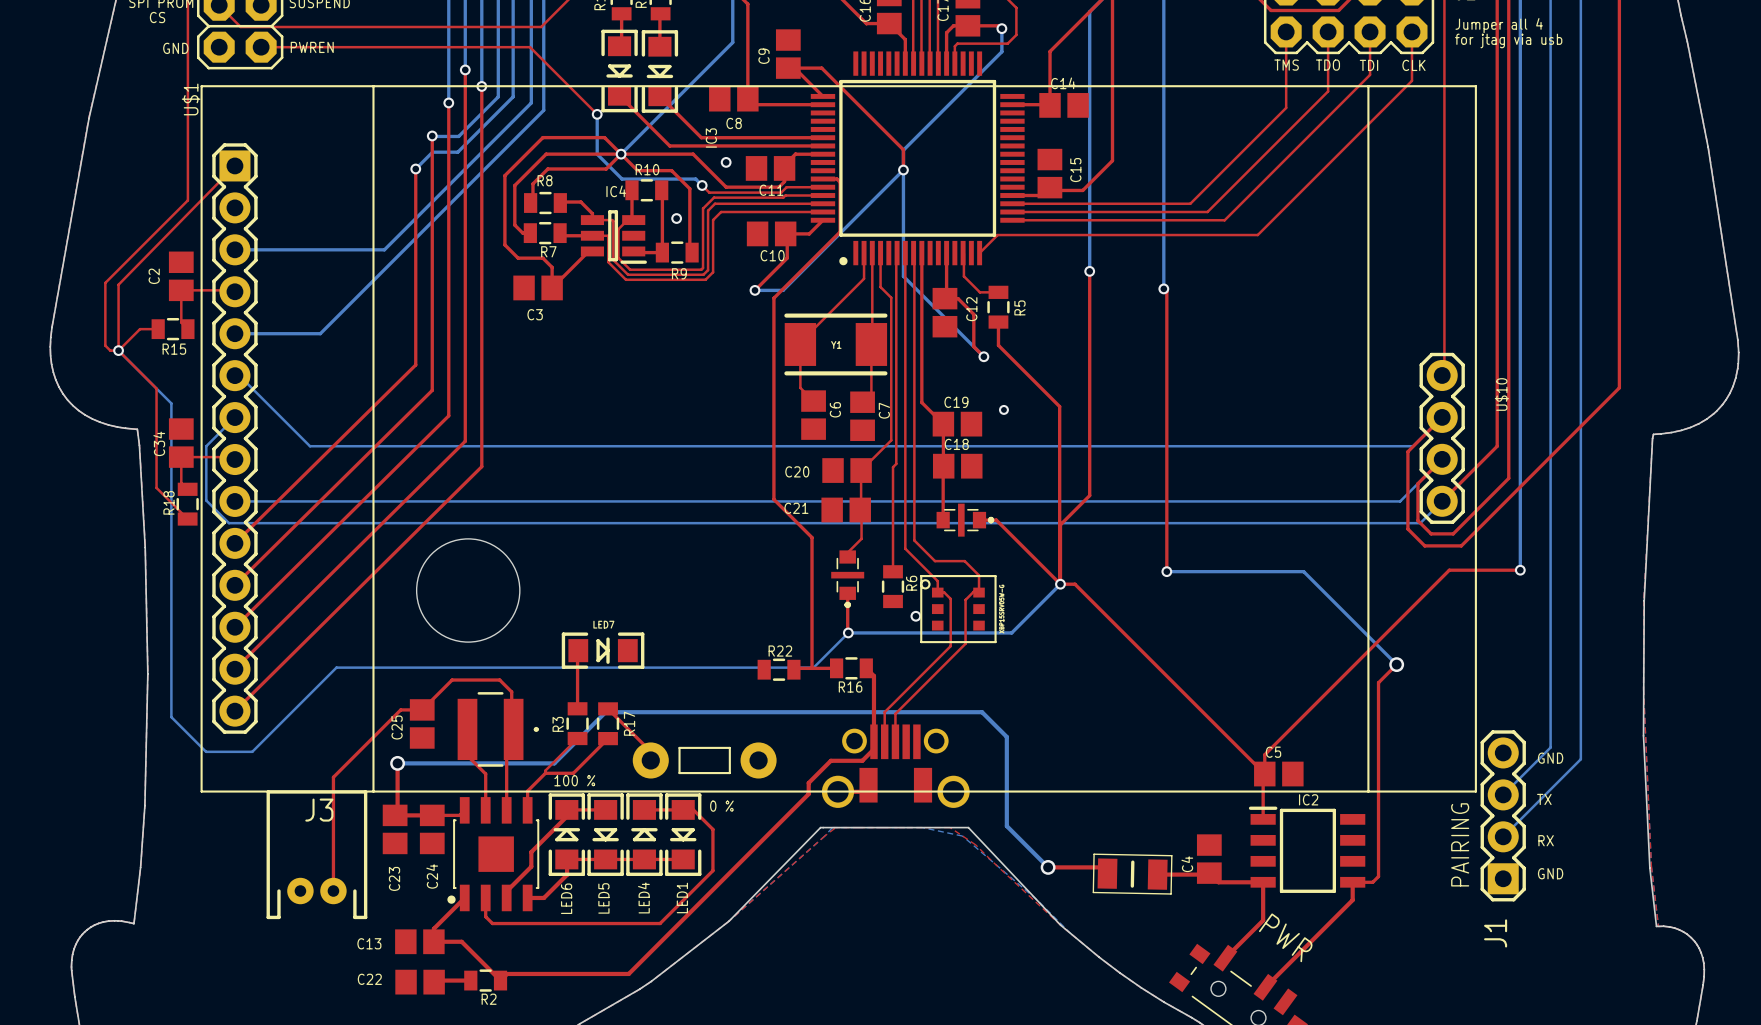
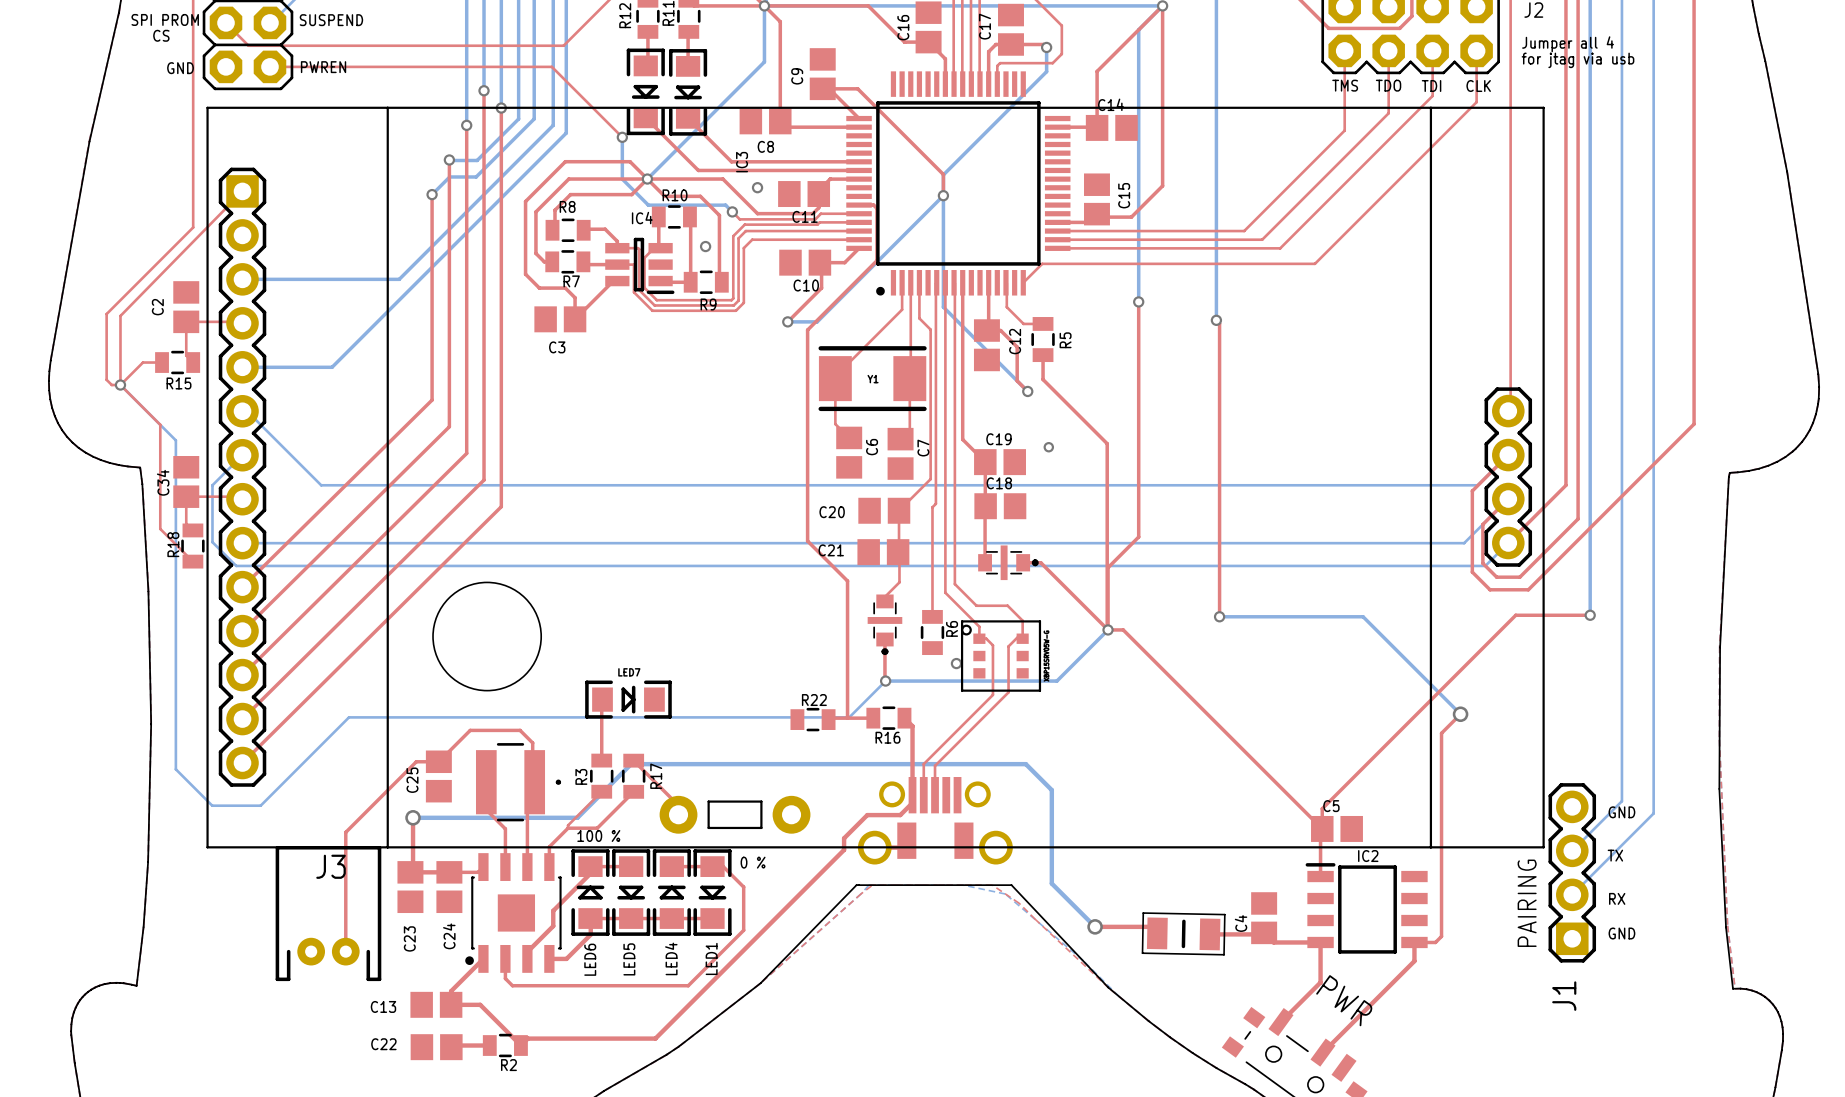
U$1 name: U$1 (191, 99) -> none
U$10 name: U$10 (1501, 394) -> none

